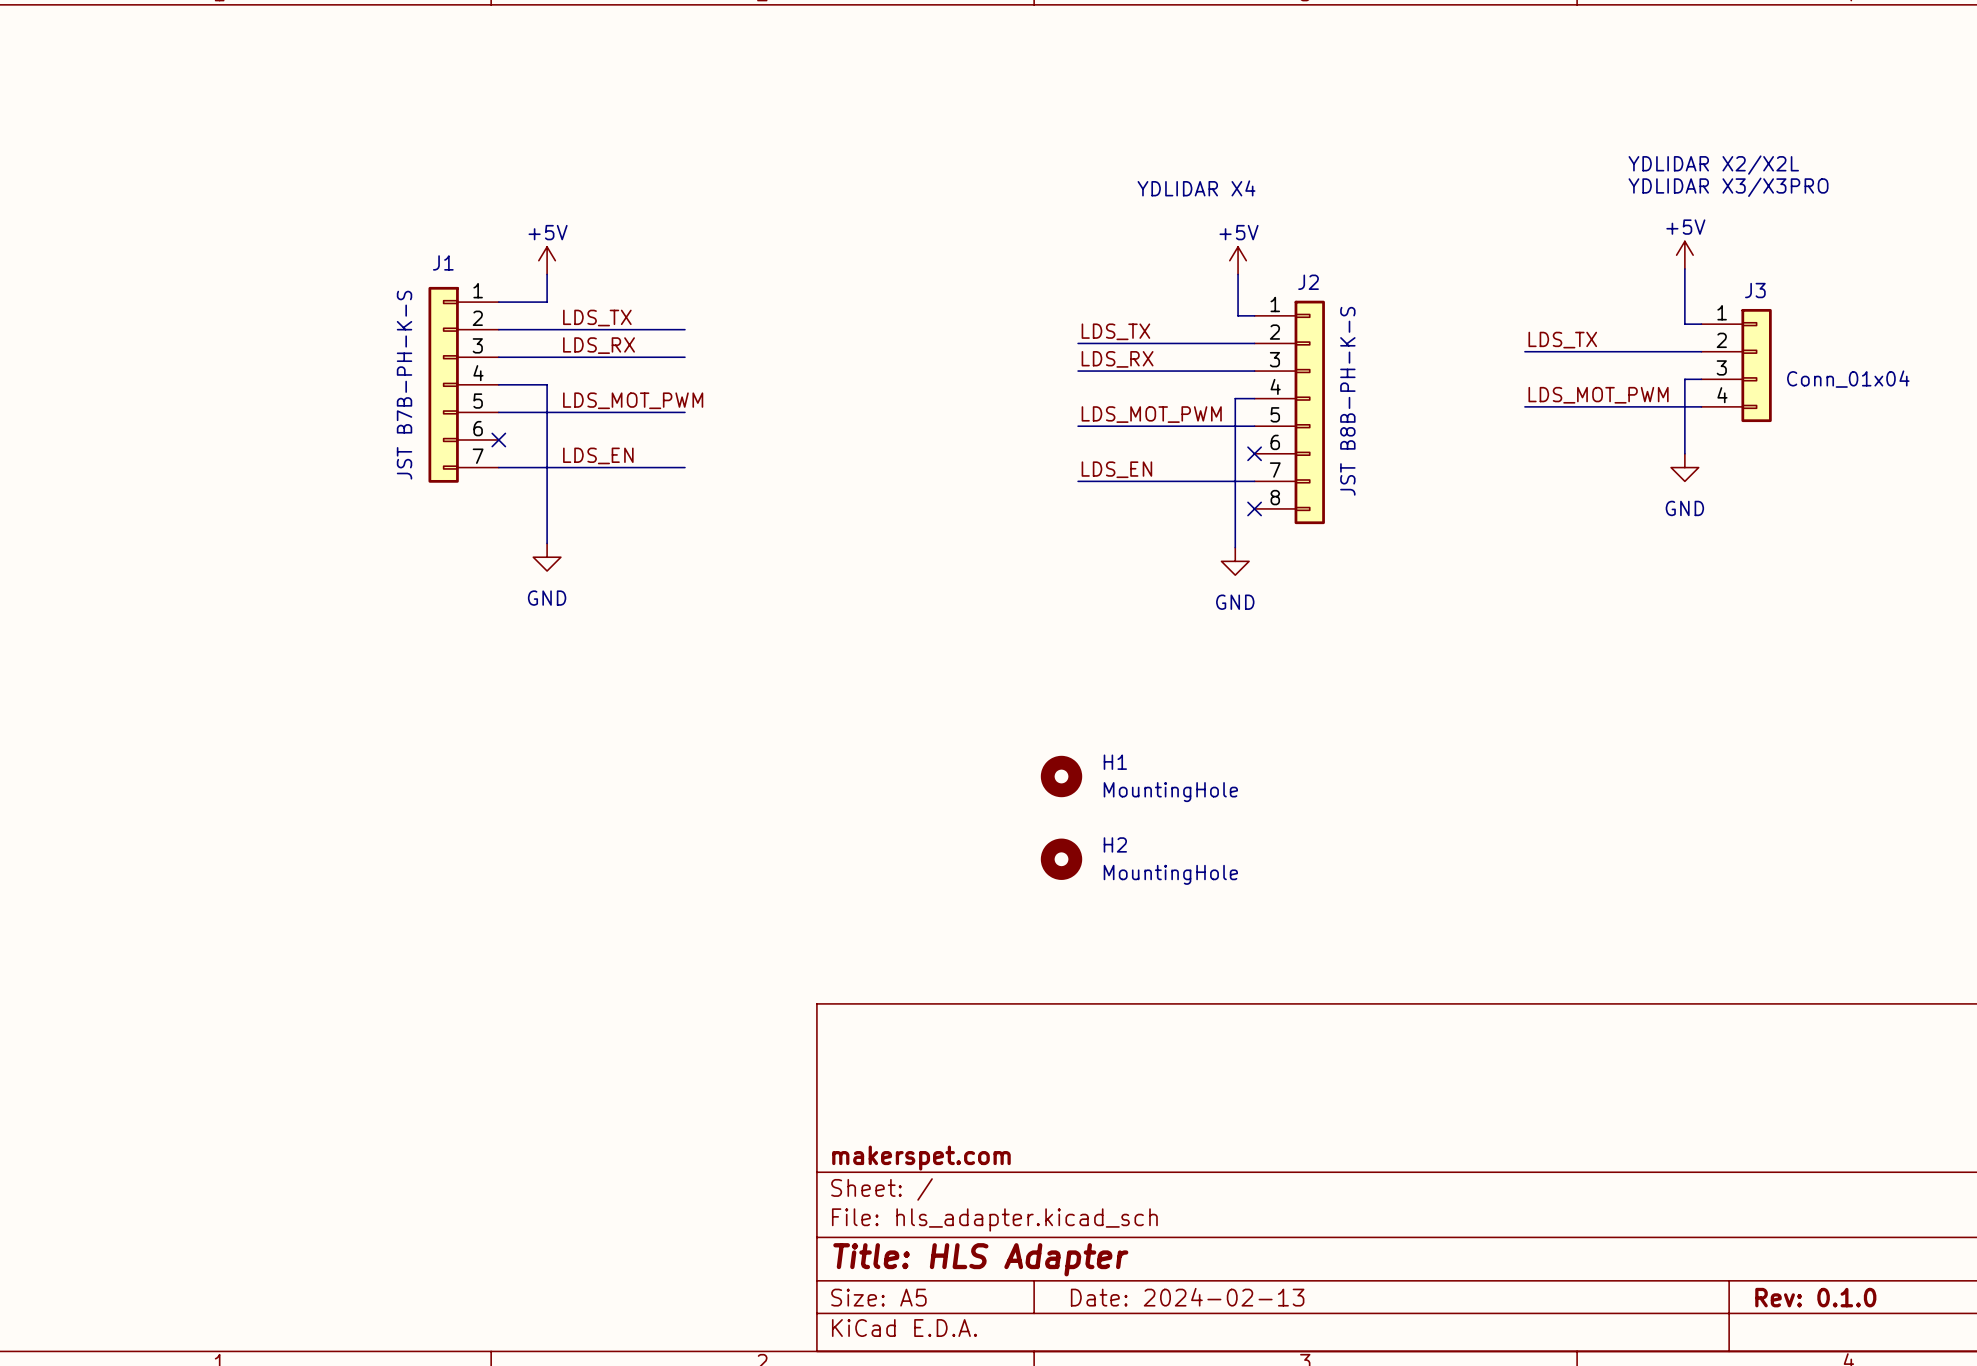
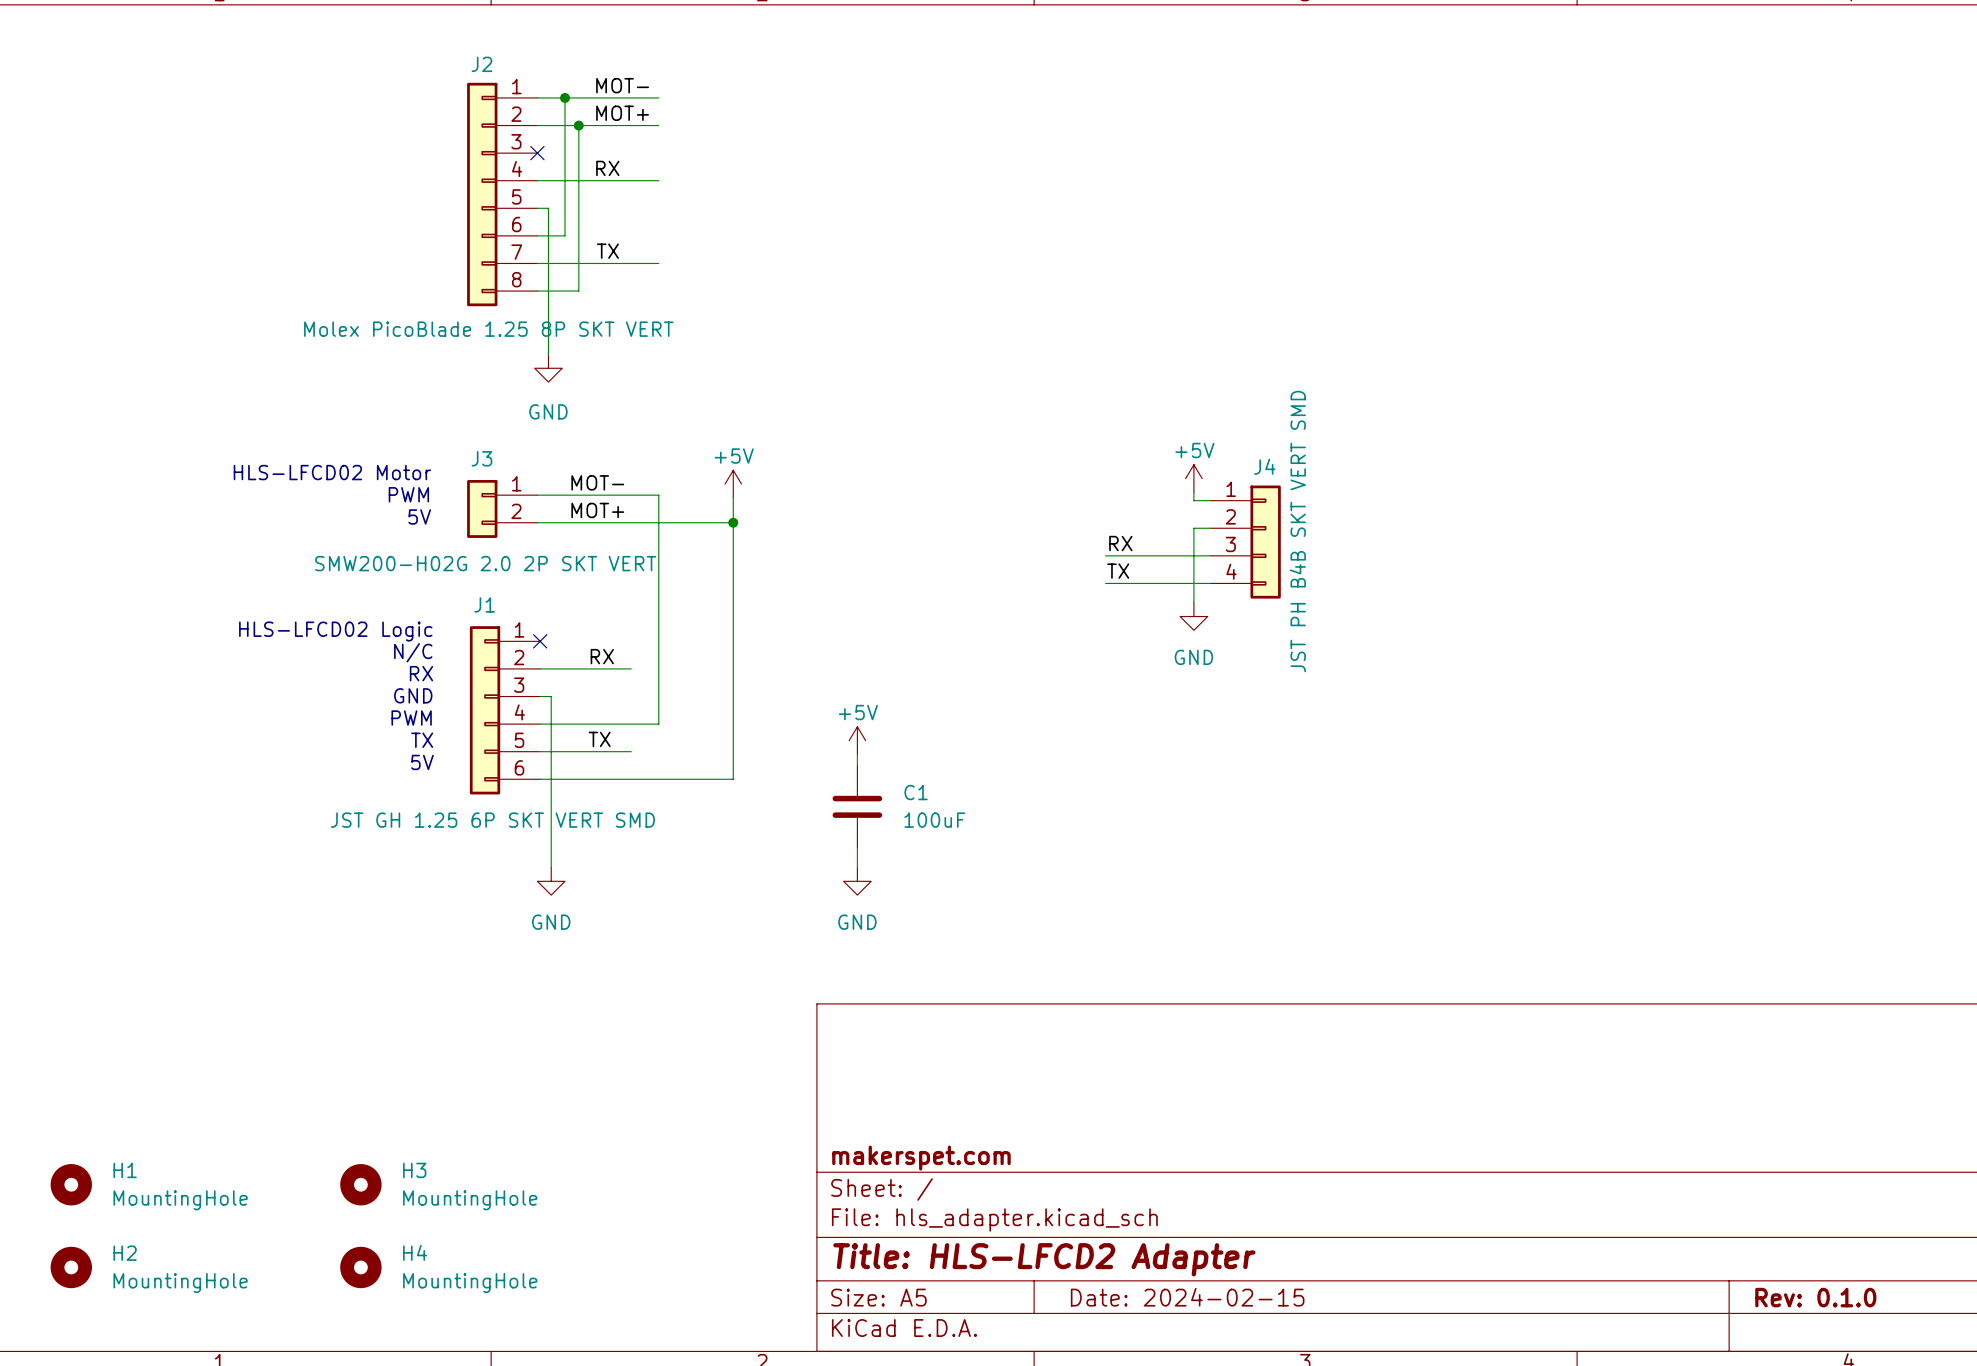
label: none -> MOT- (622, 85)
wire: none -> (537, 97) (658, 97)
wire: none -> (565, 97) (565, 235) (537, 235)
junction: none -> (565, 97)
label: none -> MOT+ (622, 113)
wire: none -> (537, 125) (658, 125)
wire: none -> (578, 125) (578, 291) (537, 291)
junction: none -> (578, 125)
no-connect mark: none -> (537, 153)
text: YDLIDAR X2/X2L (1713, 165) -> none
label: none -> RX (607, 168)
wire: none -> (537, 180) (658, 180)
text: YDLIDAR X3/X3PRO (1728, 187) -> none
text: YDLIDAR X4 (1196, 188) -> none
wire: none -> (537, 208) (548, 208) (548, 354)
label: none -> TX (607, 251)
power symbol: +5V (1684, 255) -> none
power symbol: +5V (547, 260) -> none
power symbol position: +5V (1238, 260) -> +5V (1193, 478)
wire: none -> (537, 263) (658, 263)
wire: (1684, 268) (1684, 324) (1701, 324) -> none
wire: (547, 274) (547, 302) (498, 302) -> none
wire: (1238, 274) (1238, 315) (1254, 315) -> none
J1 symbol: [428, 286, 499, 483] -> [469, 626, 541, 795]
J3 name position: J3 (1755, 290) -> J3 (481, 458)
J3 symbol: [1701, 308, 1772, 423] -> [467, 479, 538, 538]
label: LDS_TX (597, 318) -> none
wire: (498, 329) (685, 329) -> none
label: LDS_TX (1115, 331) -> none
label: LDS_TX (1562, 340) -> none
wire: (1078, 343) (1254, 343) -> none
label: LDS_RX (599, 345) -> none
wire: (1524, 351) (1701, 351) -> none
wire: (498, 357) (685, 357) -> none
label: LDS_RX (1117, 359) -> none
power symbol: none -> GND (548, 368)
wire: (1078, 371) (1254, 371) -> none
wire: (1701, 379) (1684, 379) (1684, 453) -> none
J3 value: Conn_01x04 (1848, 379) -> SMW200-H02G 2.0 2P SKT VERT (485, 563)
wire: (498, 384) (547, 384) (547, 543) -> none
J1 value: JST B7B-PH-K-S (404, 385) -> JST GH 1.25 6P SKT VERT SMD (492, 820)
label: LDS_MOT_PWM (1598, 395) -> none
wire: (1254, 398) (1235, 398) (1235, 547) -> none
label: LDS_MOT_PWM (633, 400) -> none
J2 value: JST B8B-PH-K-S (1347, 401) -> Molex PicoBlade 1.25 8P SKT VERT (488, 329)
wire: (1524, 406) (1701, 406) -> none
wire: (498, 412) (685, 412) -> none
J2 position: (1289, 412) -> (502, 194)
J2 flip: as is (1309, 412) -> left-right (482, 194)
label: LDS_MOT_PWM (1151, 414) -> none
wire: (1078, 426) (1254, 426) -> none
no-connect mark: (498, 439) -> none
no-connect mark: (1254, 453) -> none
label: LDS_EN (598, 455) -> none
wire: (498, 467) (685, 467) -> none
power symbol: GND (1684, 467) -> none
label: LDS_EN (1116, 469) -> none
text: none -> HLS-LFCD02 Motor (332, 472)
wire: (1078, 481) (1254, 481) -> none
label: none -> MOT- (597, 482)
power symbol: none -> +5V (733, 484)
wire: none -> (1193, 492) (1193, 500) (1210, 500)
text: none -> PWM (408, 494)
wire: none -> (537, 495) (658, 495) (658, 724) (540, 724)
wire: none -> (733, 497) (733, 779) (540, 779)
no-connect mark: (1254, 508) -> none
label: none -> MOT+ (597, 510)
text: none -> 5V (419, 516)
wire: none -> (537, 522) (733, 522)
junction: none -> (733, 522)
wire: none -> (1210, 528) (1193, 528) (1193, 602)
J4: none -> JST PH B4B SKT VERT SMD (1245, 542)
label: none -> RX (1120, 543)
wire: none -> (1105, 555) (1210, 555)
power symbol: GND (547, 557) -> none
power symbol position: GND (1235, 561) -> GND (1193, 616)
label: none -> TX (1118, 571)
wire: none -> (1105, 583) (1210, 583)
text: none -> HLS-LFCD02 Logic (335, 631)
no-connect mark: none -> (540, 641)
text: none -> N/C (413, 652)
label: none -> RX (602, 656)
wire: none -> (540, 668) (631, 668)
text: none -> RX (421, 673)
text: none -> GND (413, 695)
wire: none -> (540, 696) (551, 696) (551, 867)
text: none -> PWM (411, 718)
label: none -> TX (599, 739)
text: none -> TX (422, 740)
power symbol: none -> +5V (857, 740)
wire: none -> (540, 751) (631, 751)
wire: none -> (857, 754) (857, 765)
text: none -> 5V (422, 762)
H1 position: (1061, 776) -> (71, 1184)
C1: none -> 100uF (857, 806)
wire: none -> (857, 848) (857, 867)
H2 position: (1061, 859) -> (71, 1267)
power symbol: none -> GND (551, 881)
power symbol: none -> GND (857, 881)
H3: none -> MountingHole (360, 1184)
title block: Title: HLS Adapter (980, 1259) -> Title: HLS-LFCD2 Adapter (1044, 1259)
H4: none -> MountingHole (360, 1267)
title block: Date: 2024-02-13 (1187, 1297) -> Date: 2024-02-15 (1187, 1297)

